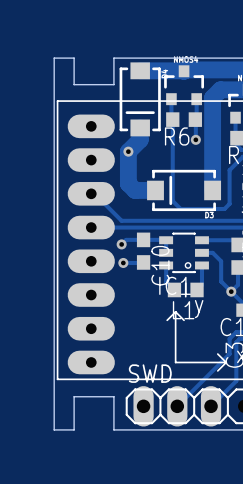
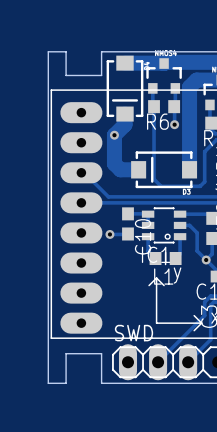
track: (143, 239) (126, 239) (121, 244) -> none
via: (121, 244) -> none

